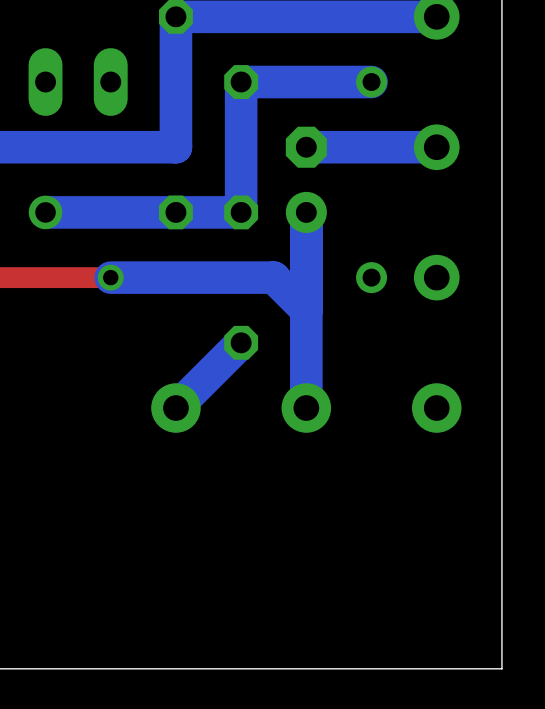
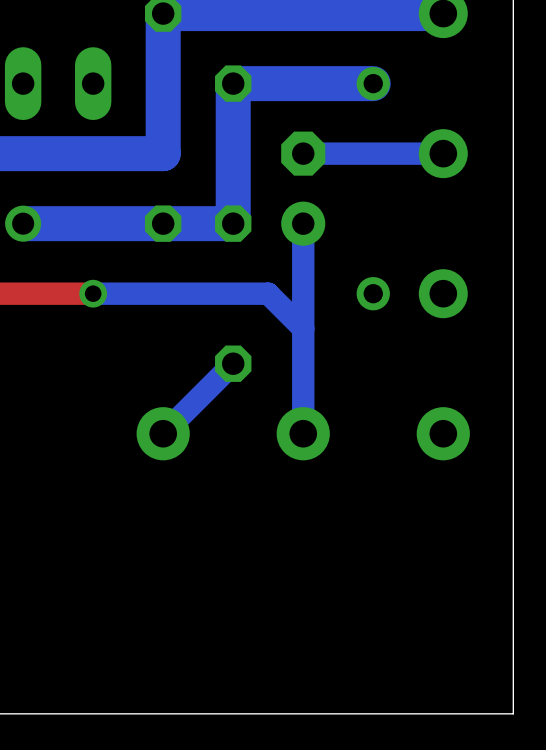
bottom track width: thick (436, 147) (306, 147) -> thin (443, 153) (303, 153)
bottom track width: thick (306, 212) (306, 408) -> thin (303, 223) (303, 433)
bottom track width: thick (110, 277) (273, 277) (306, 310) -> thin (93, 293) (268, 293) (303, 328)
bottom track width: thick (241, 342) (175, 408) -> thin (233, 363) (163, 433)

